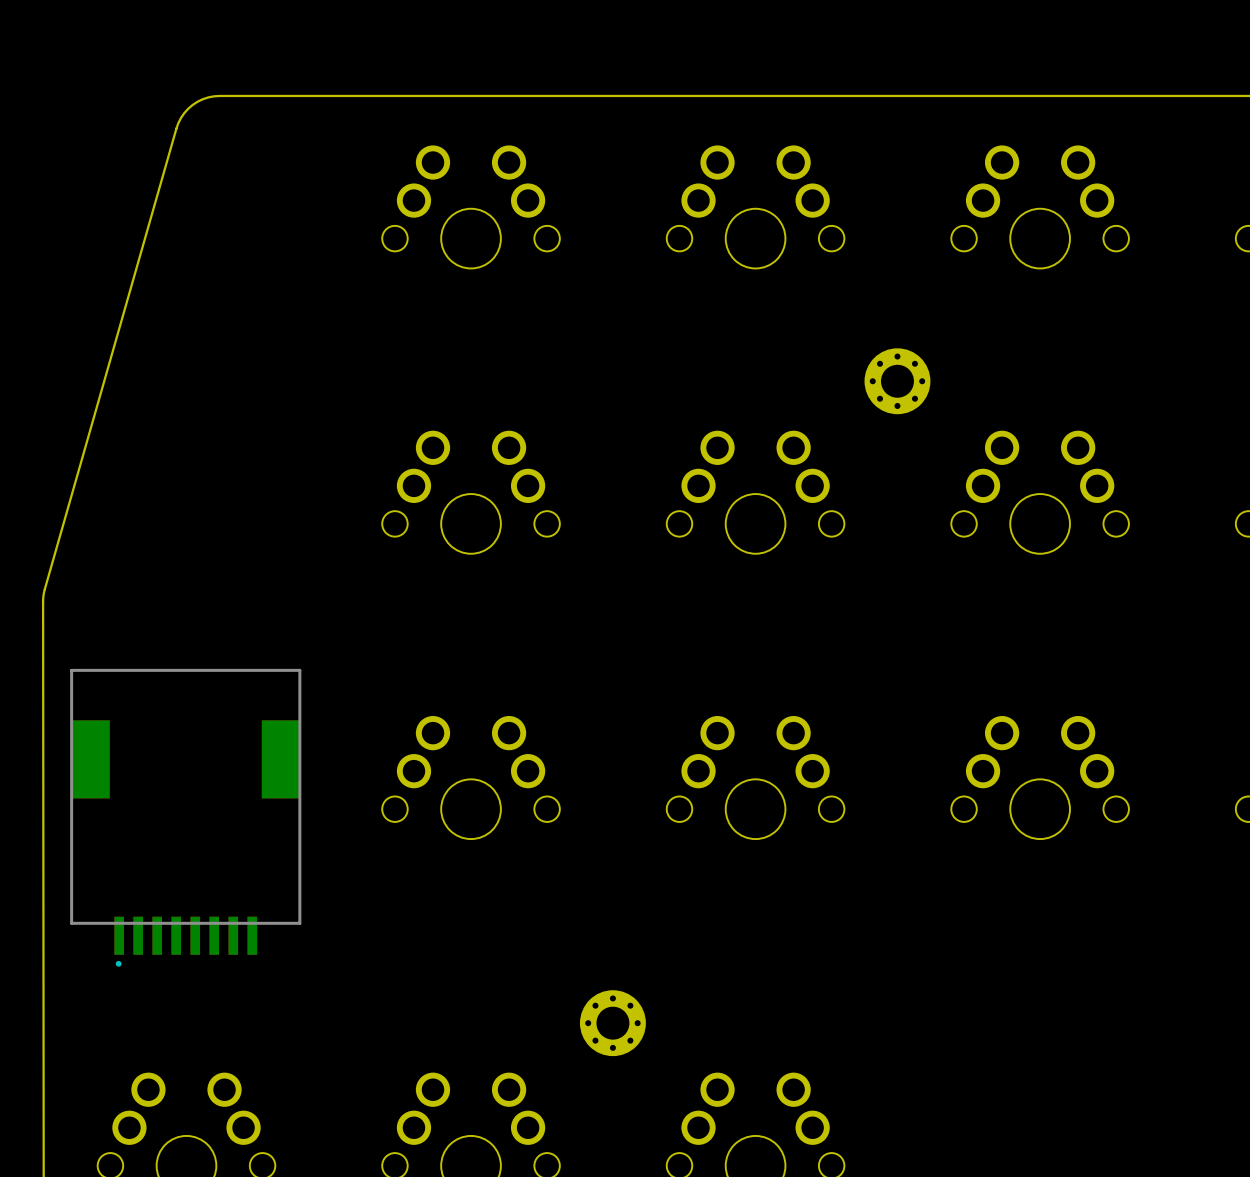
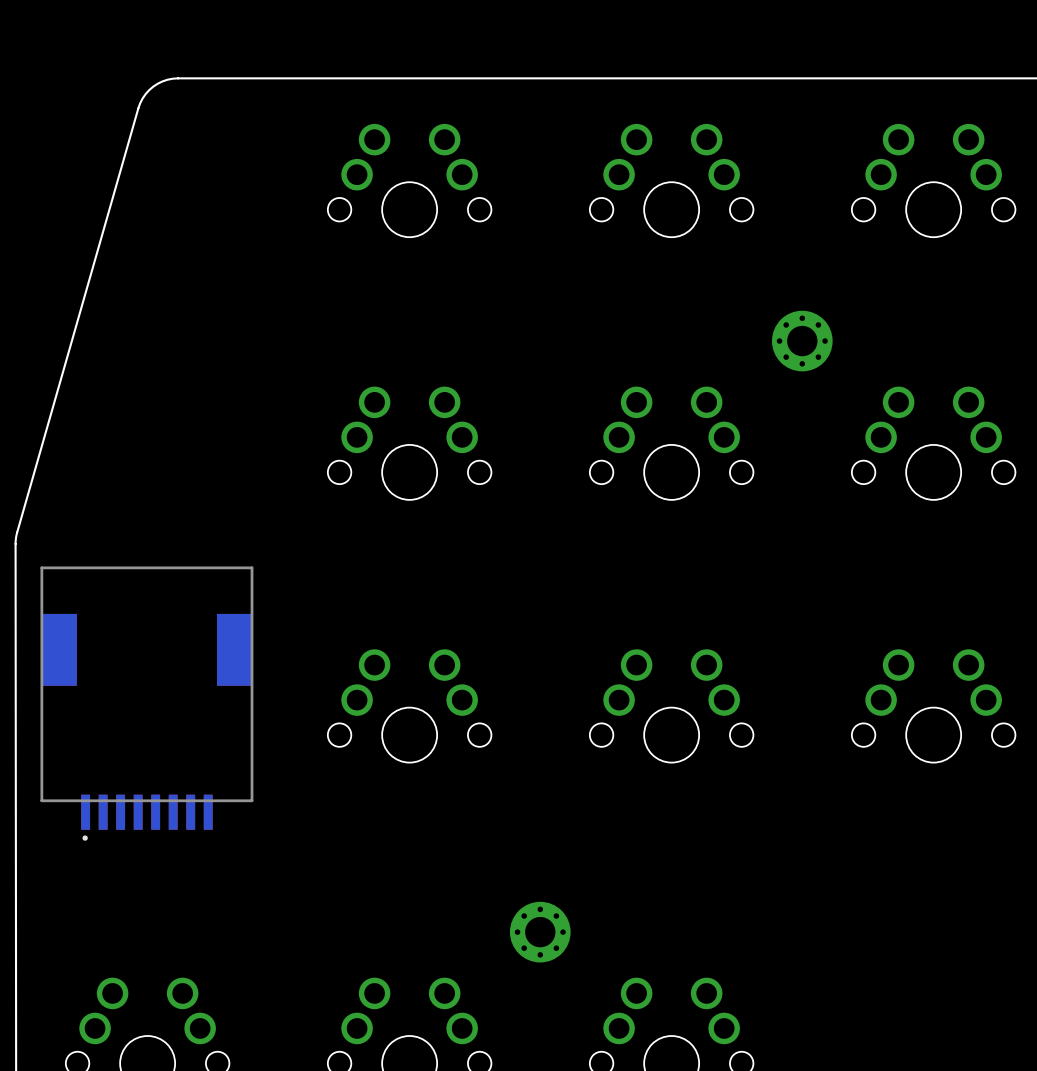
part position: (185, 817) -> (146, 703)

